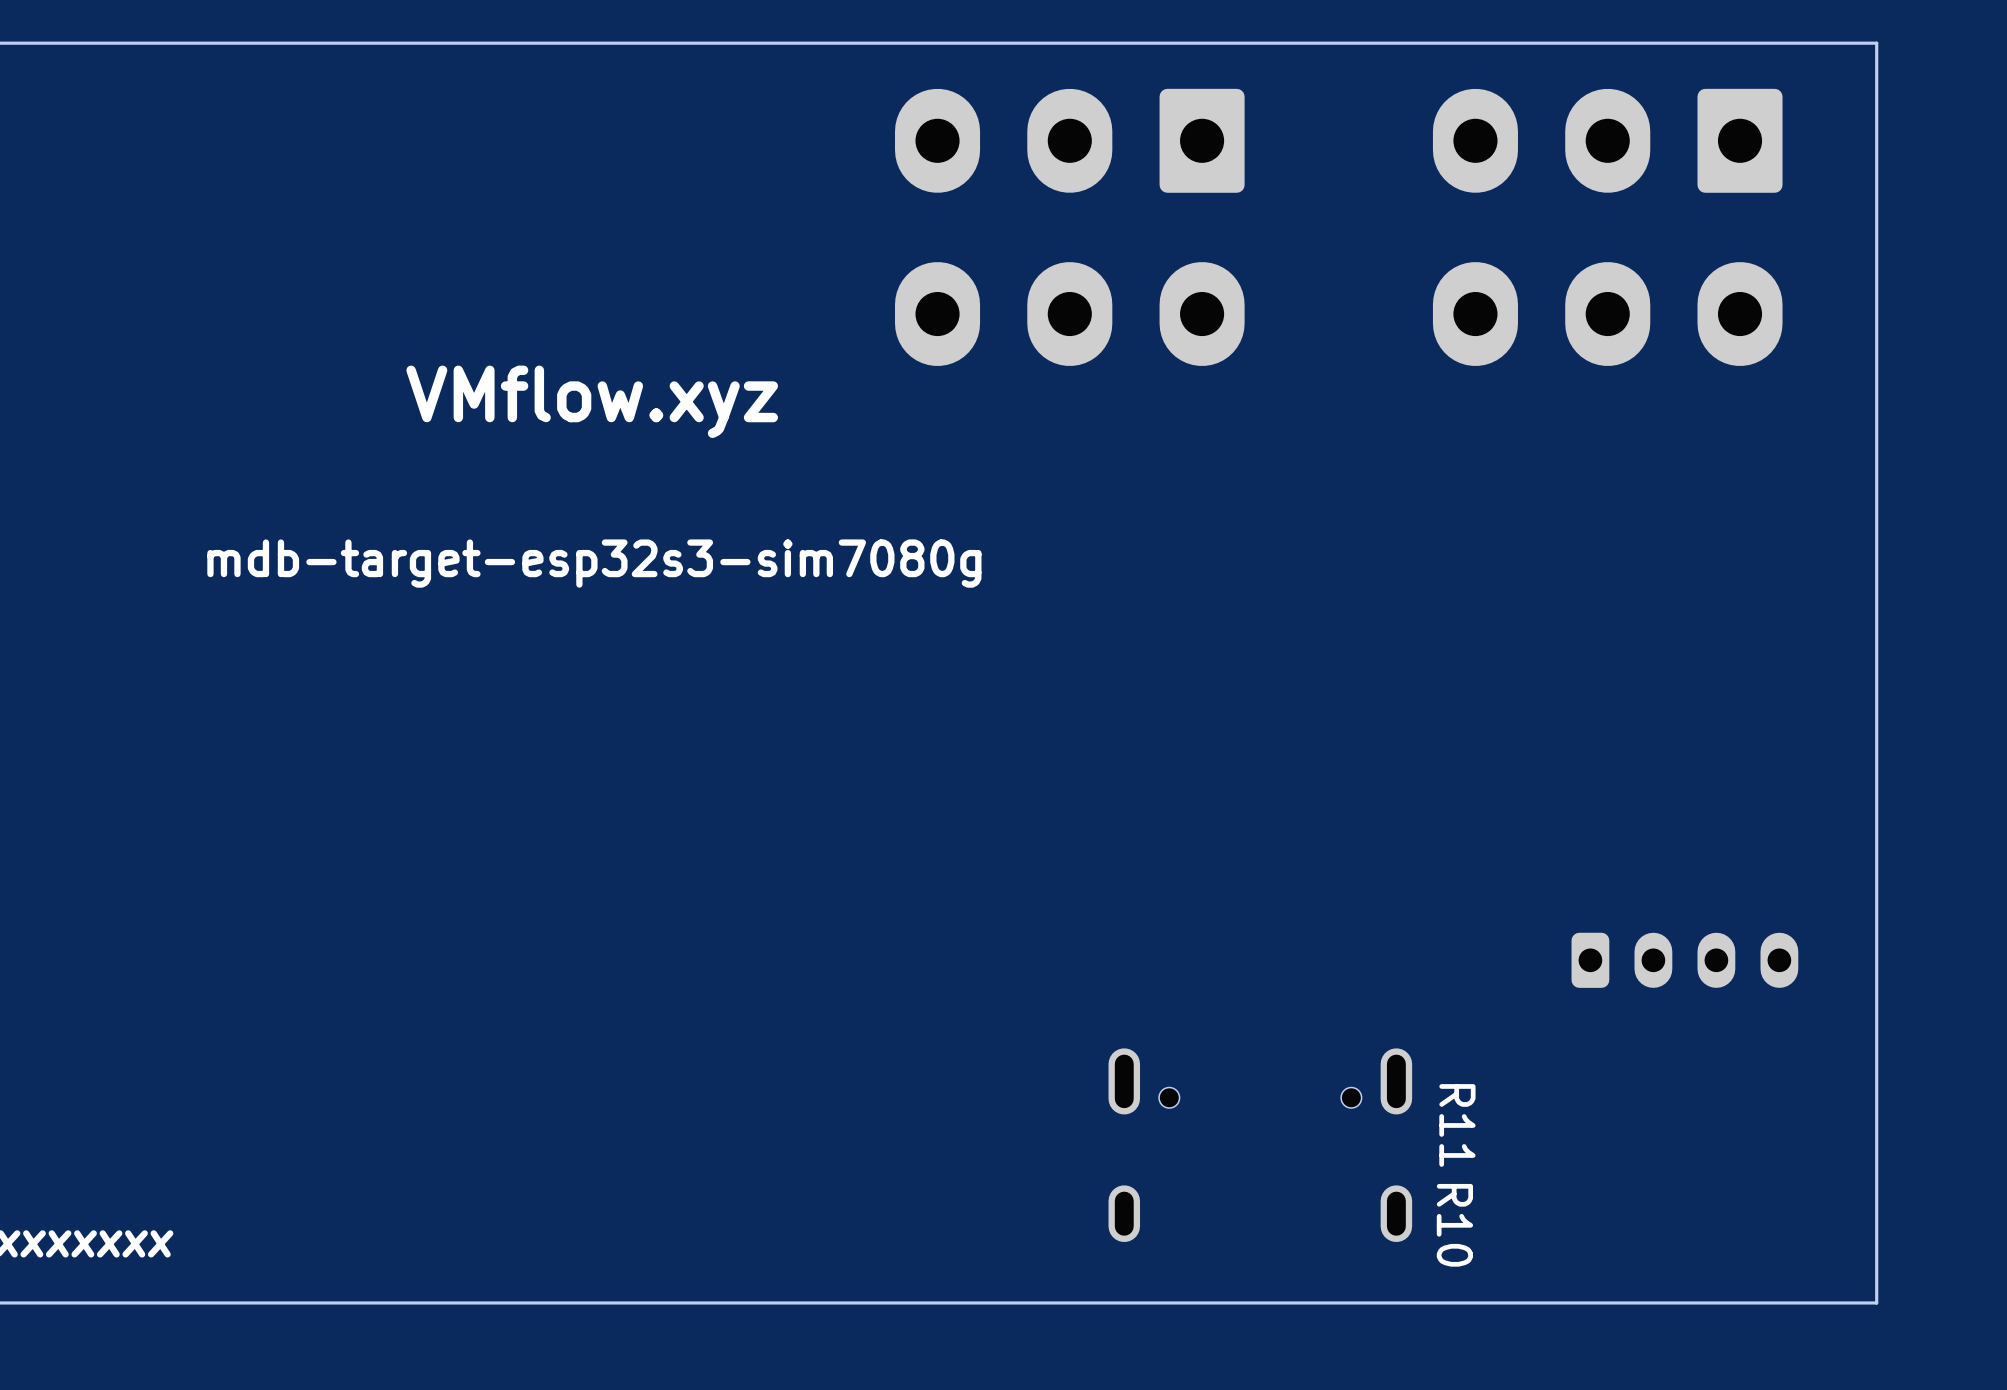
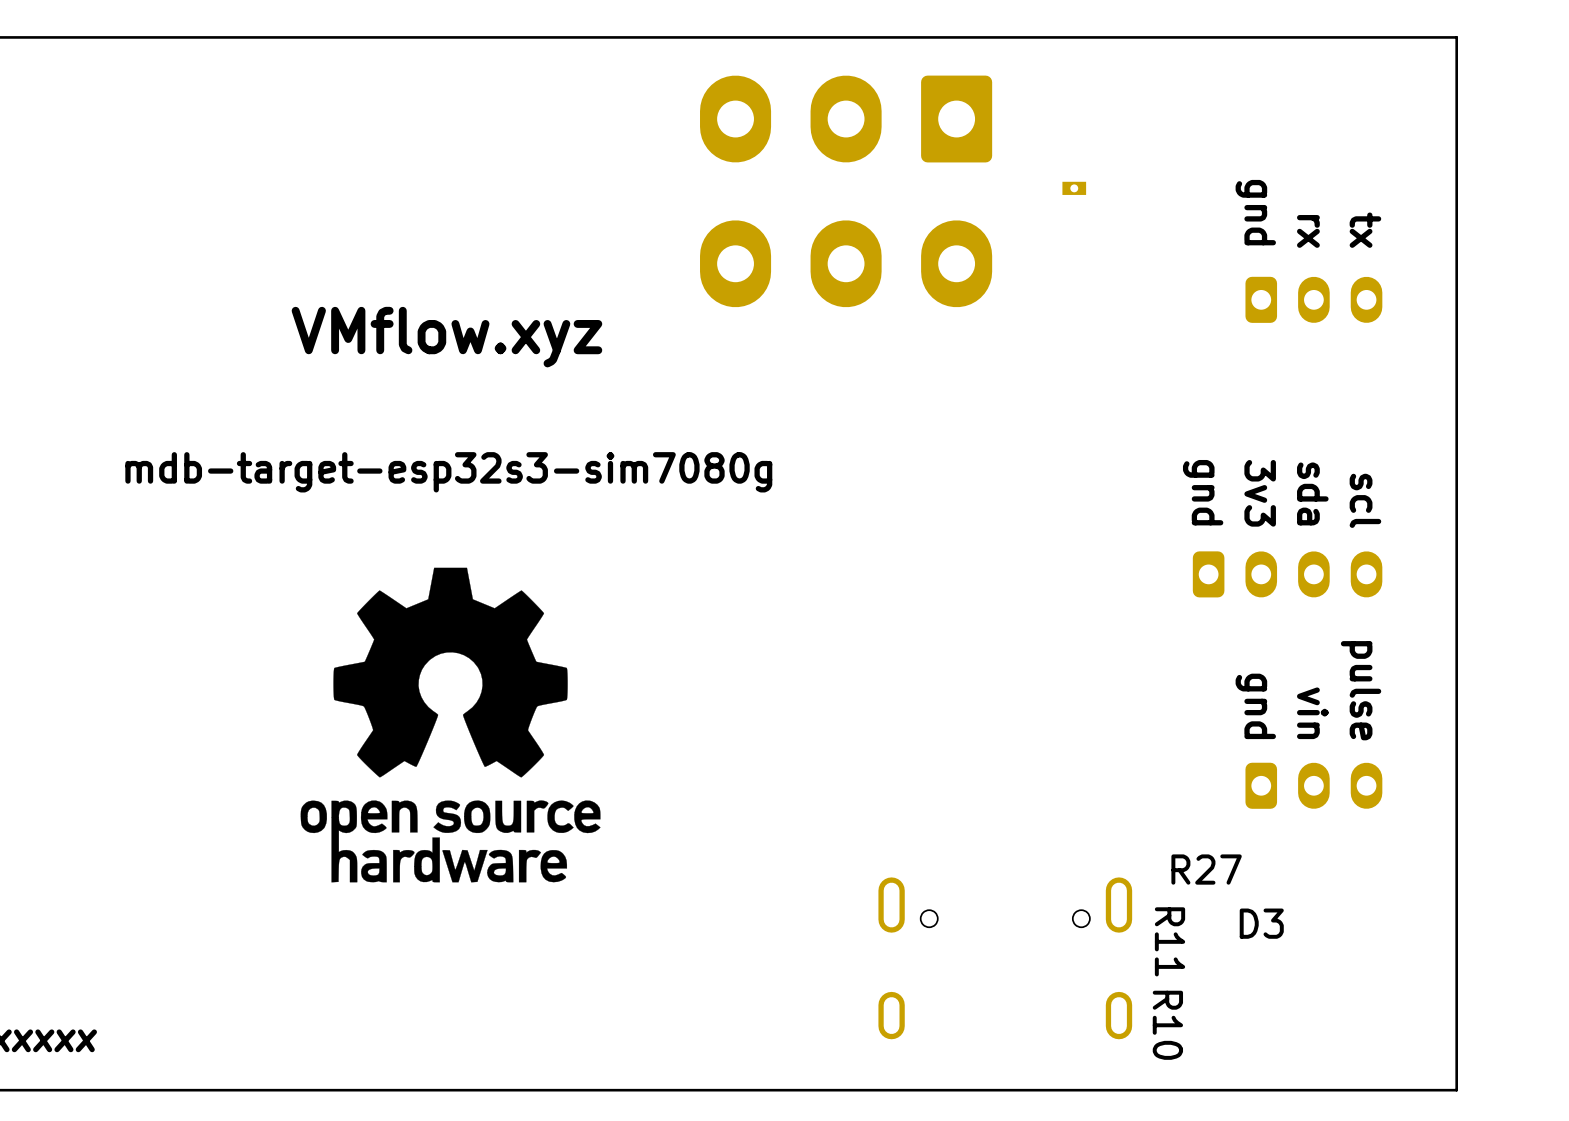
board edge: (1800, 43) (1876, 43) (1876, 1302) (1800, 1302) -> (1456, 37) (1456, 1090)
part: none -> (1074, 188)
part: (1607, 227) -> none
text: none -> gnd (1255, 212)
text: none -> tx (1365, 230)
text: none -> rx (1308, 231)
part: none -> (1313, 299)
text: none -> gnd (1203, 492)
text: none -> 3v3 (1260, 493)
text: none -> sda (1312, 493)
text: none -> scl (1365, 500)
drawing: none -> [300, 567, 601, 883]
text: none -> pulse (1361, 690)
text: none -> gnd (1255, 706)
text: none -> vin (1312, 713)
part: none -> (1313, 785)
part position: (1684, 960) -> (1287, 574)
R27: none -> (1206, 869)
D3: none -> (1261, 923)

